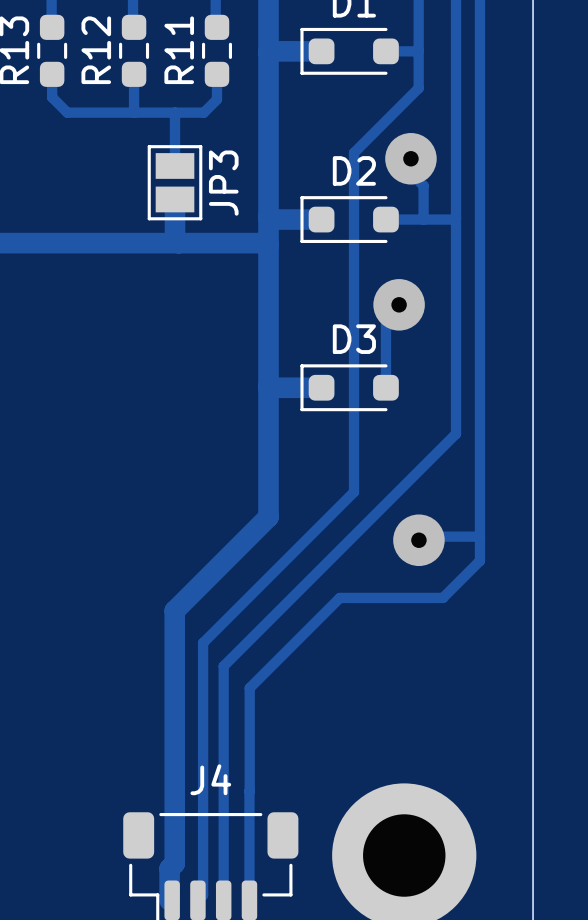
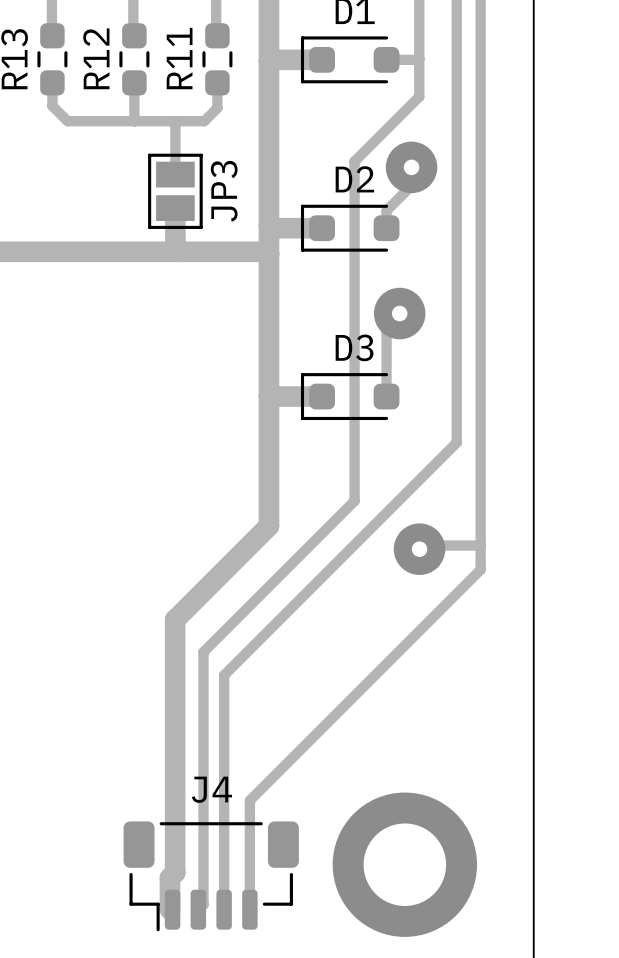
track: (410, 173) (423, 185) (423, 219) -> none
track: (456, 218) (454, 219) (385, 219) -> (411, 185) (386, 210) (386, 228)
track: (442, 597) (339, 597) (249, 688) (249, 791) -> (443, 606) (250, 800)

